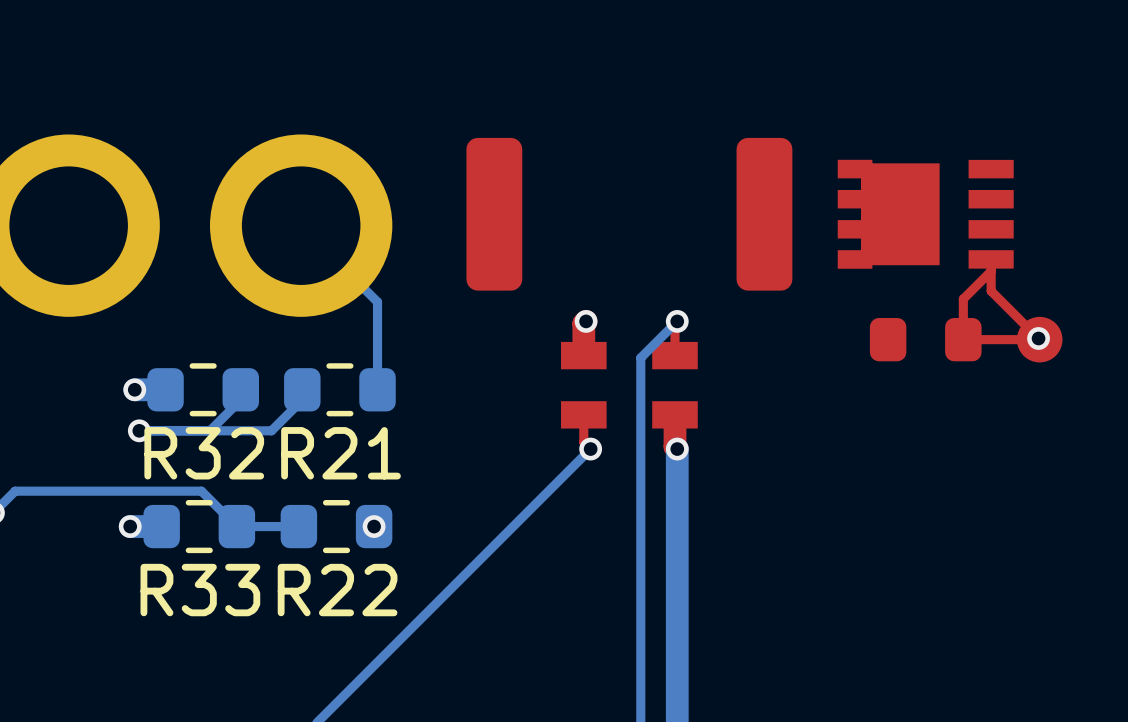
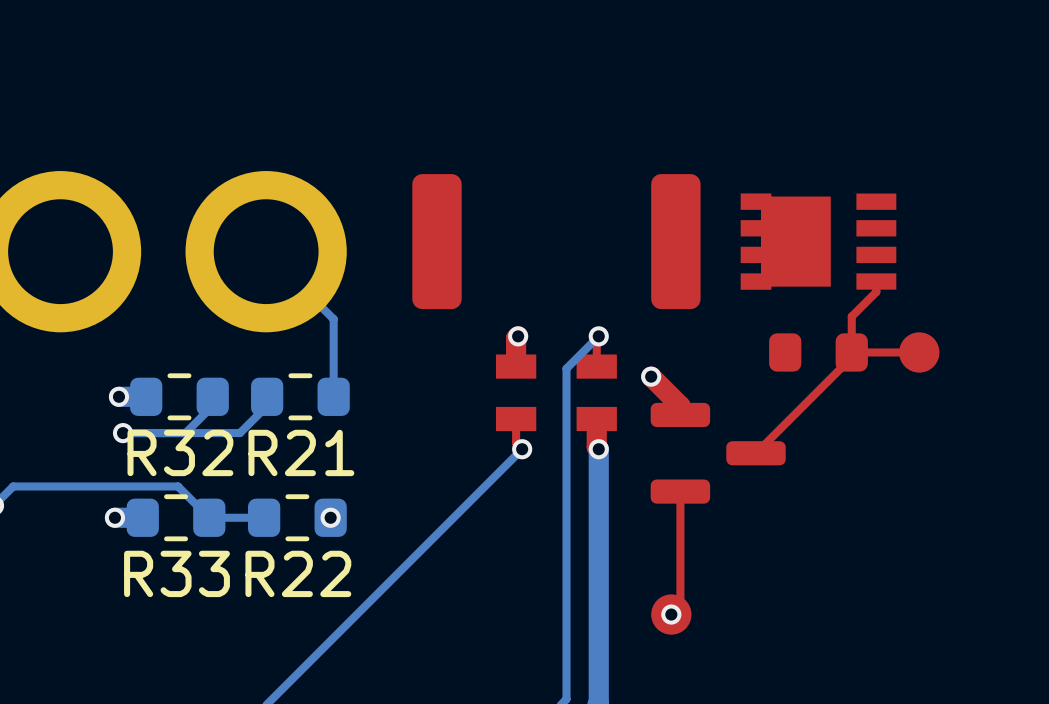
top track: (991, 271) (991, 291) (1038, 338) -> none
via: (1038, 338) -> none
top track: none -> (851, 352) (851, 357) (756, 453)
top track: none -> (651, 376) (680, 405) (680, 414)
via: none -> (651, 376)
part: none -> (718, 453)
top track: none -> (680, 491) (680, 605) (671, 614)
via: none -> (671, 614)
part: none -> (671, 614)

